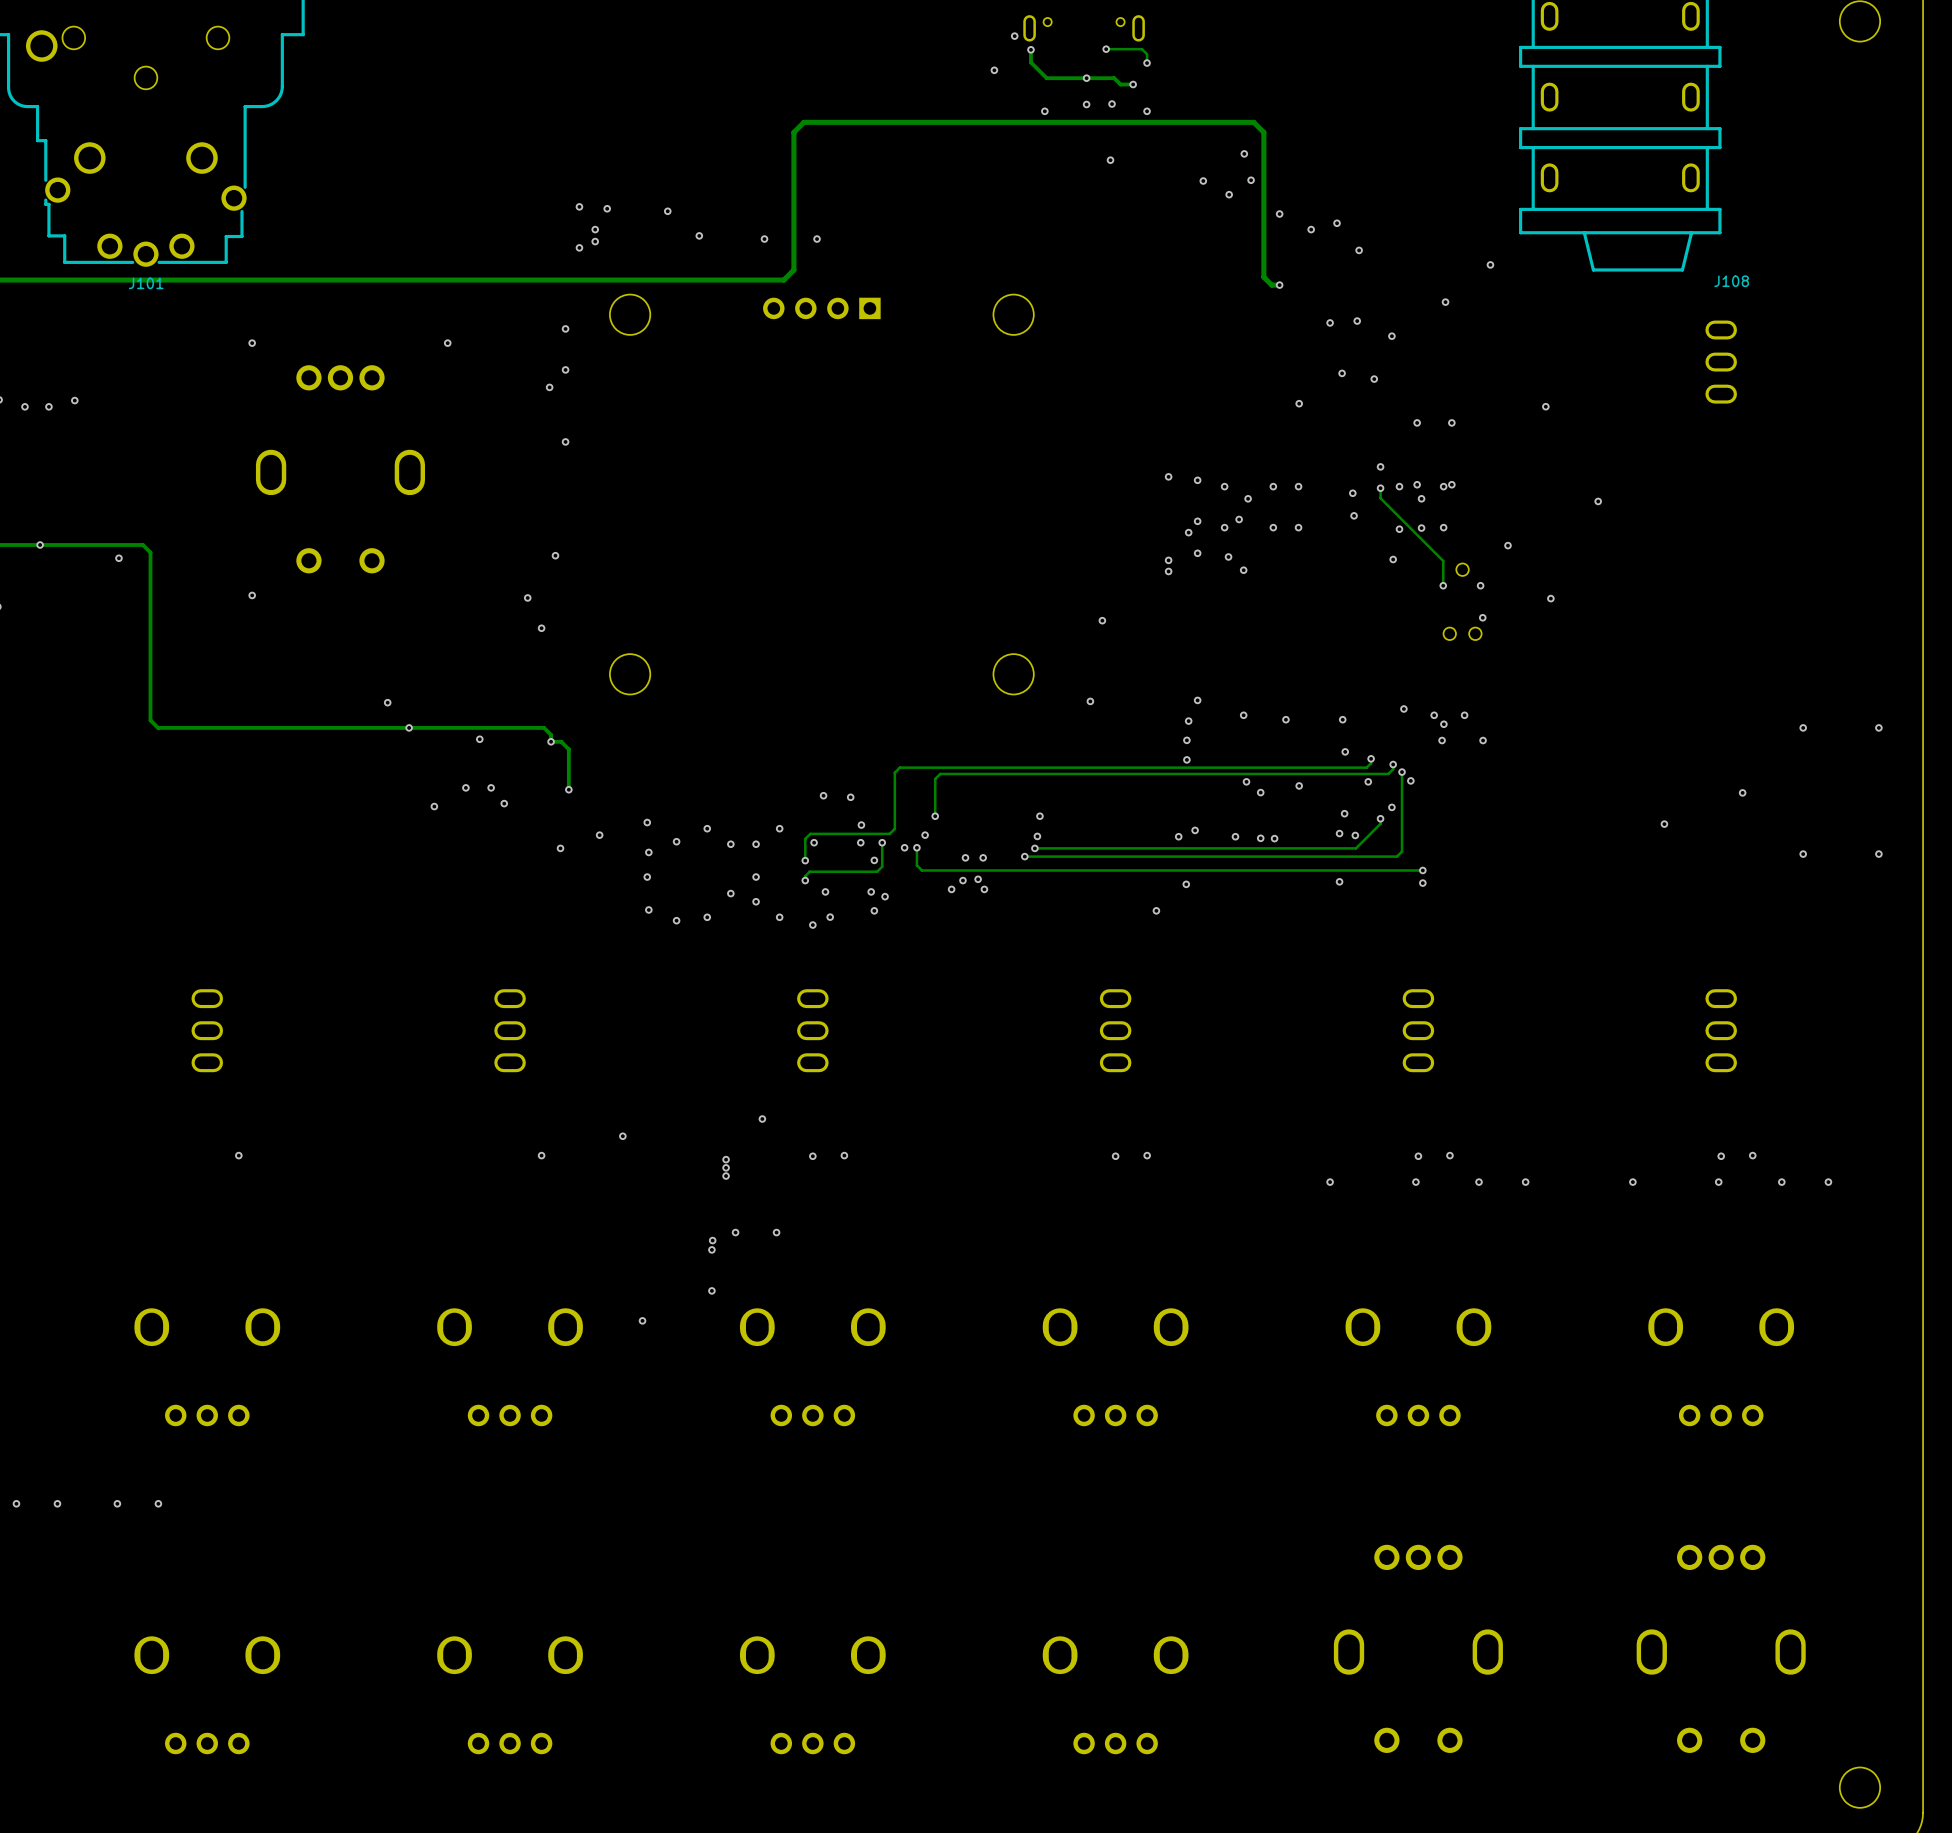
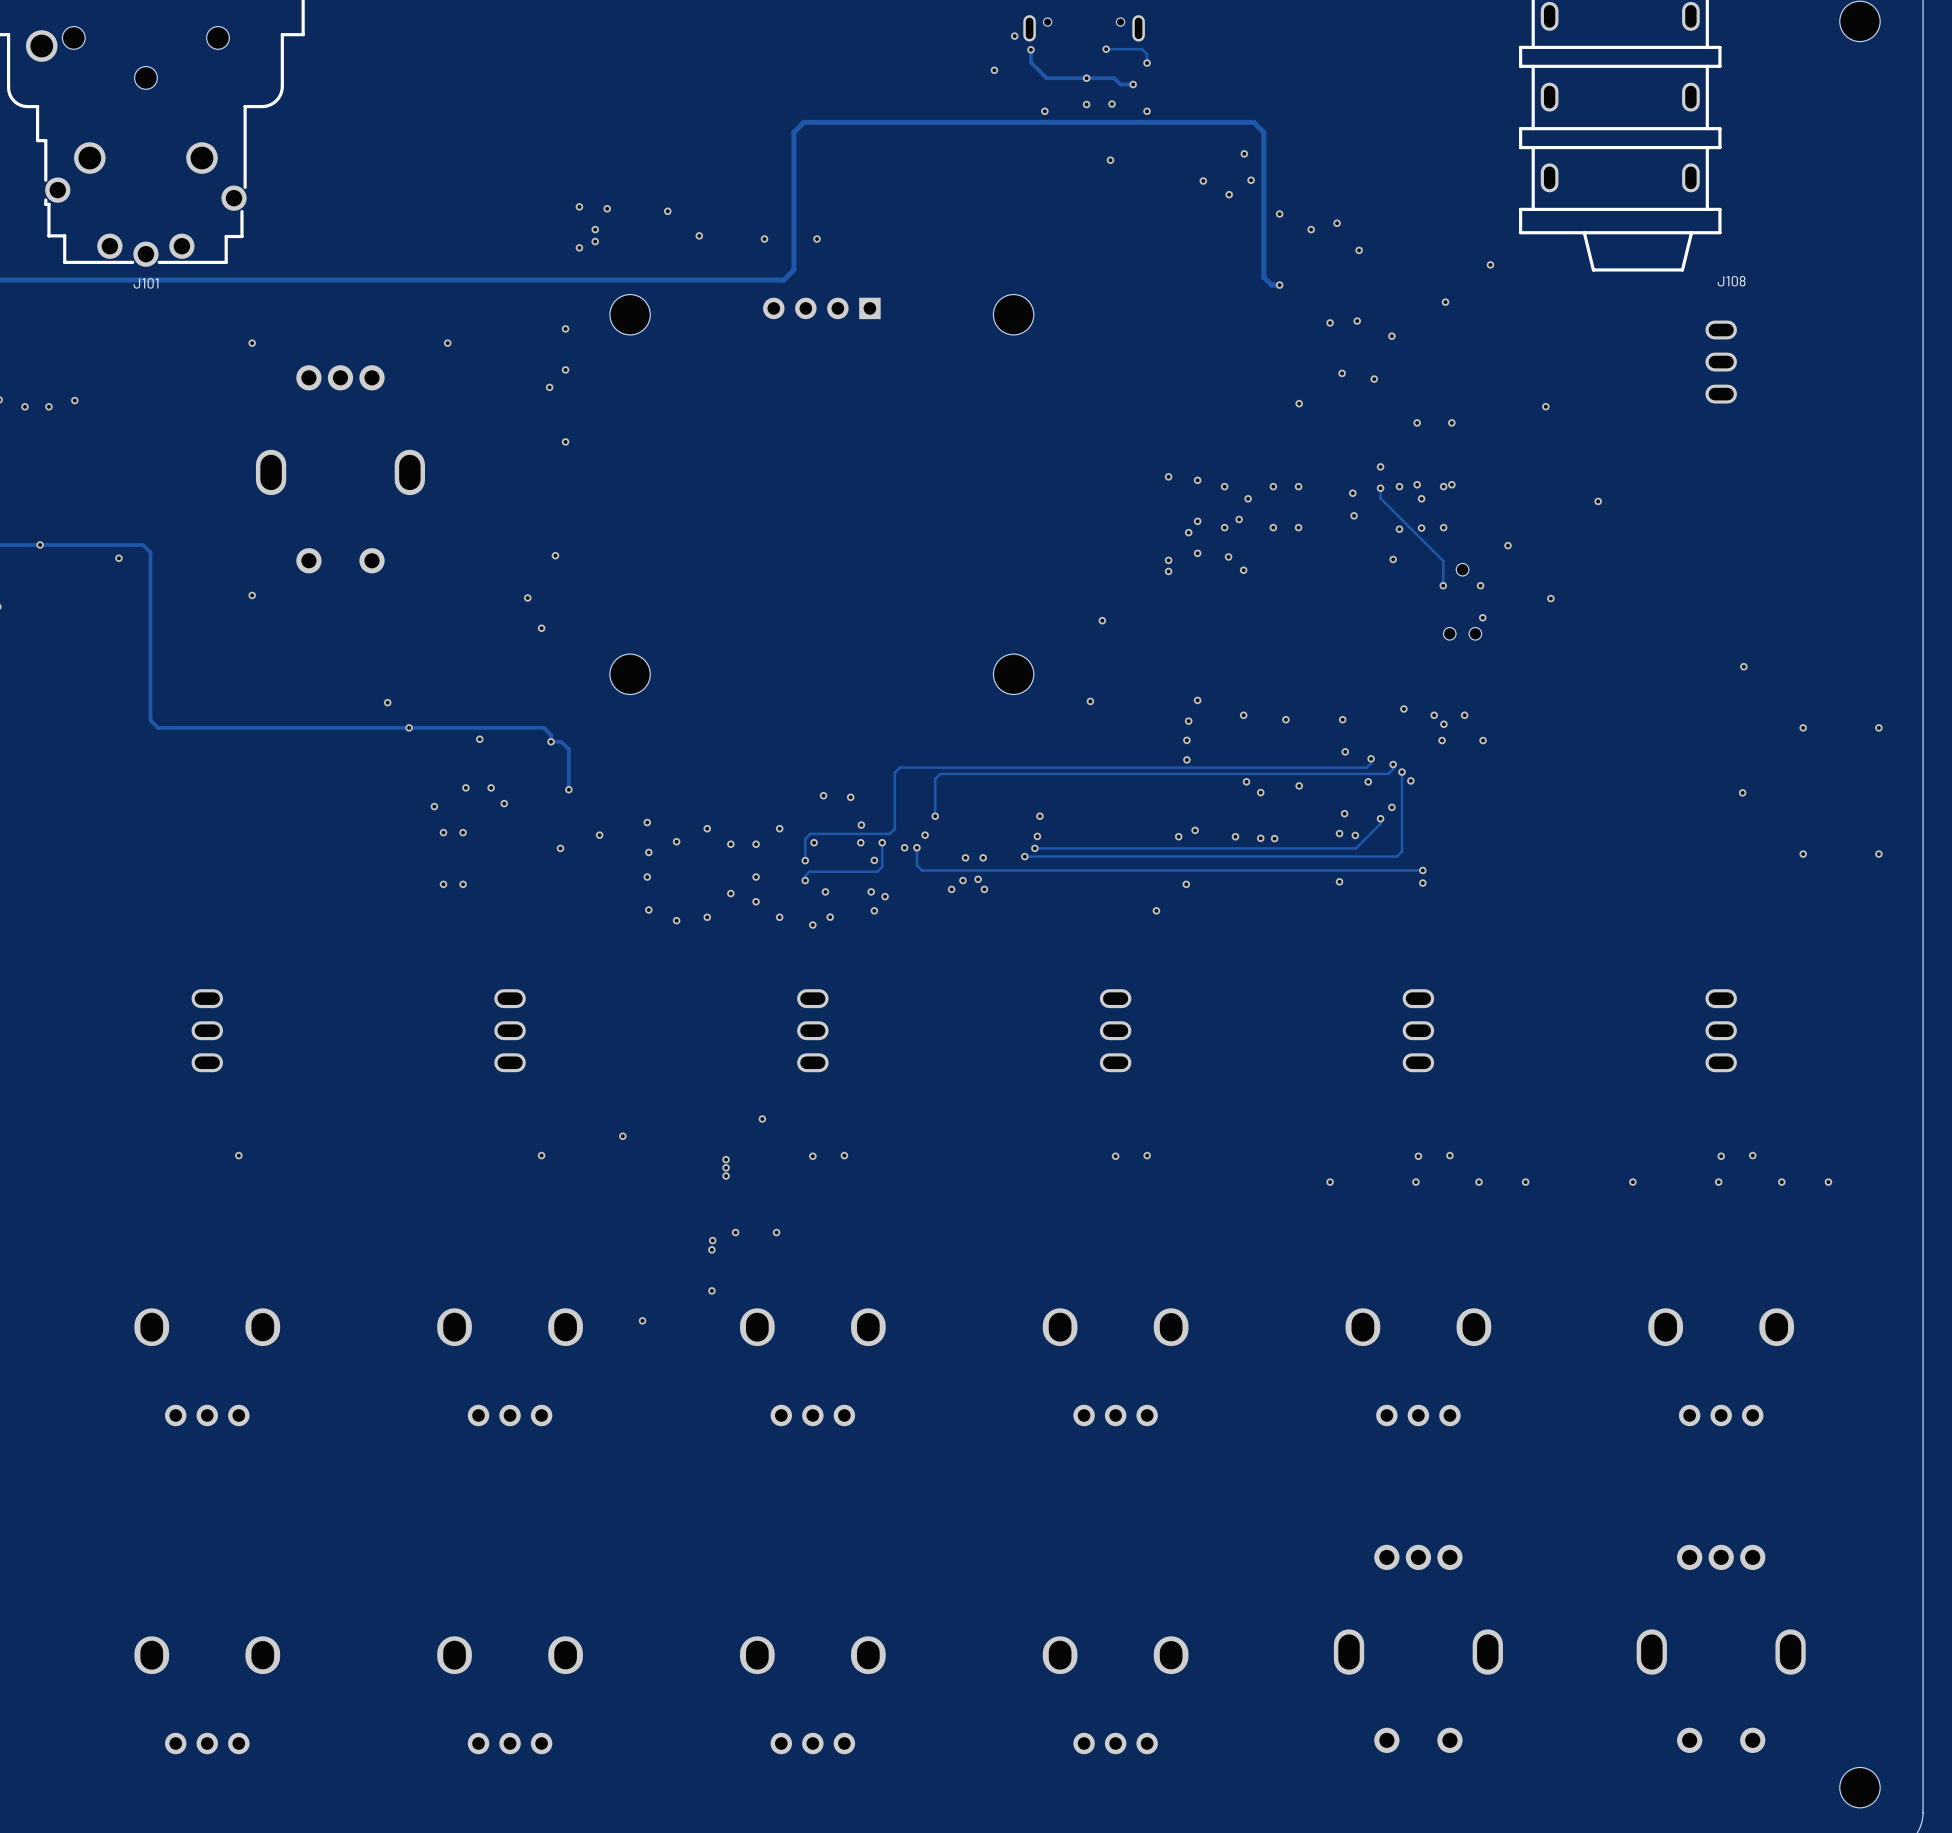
via: none -> (1743, 666)
via: (1664, 824) -> none
via: none -> (443, 832)
via: none -> (463, 832)
via: none -> (443, 884)
via: none -> (463, 884)
via: (16, 1503) -> none
via: (57, 1503) -> none
via: (117, 1503) -> none
via: (158, 1503) -> none

